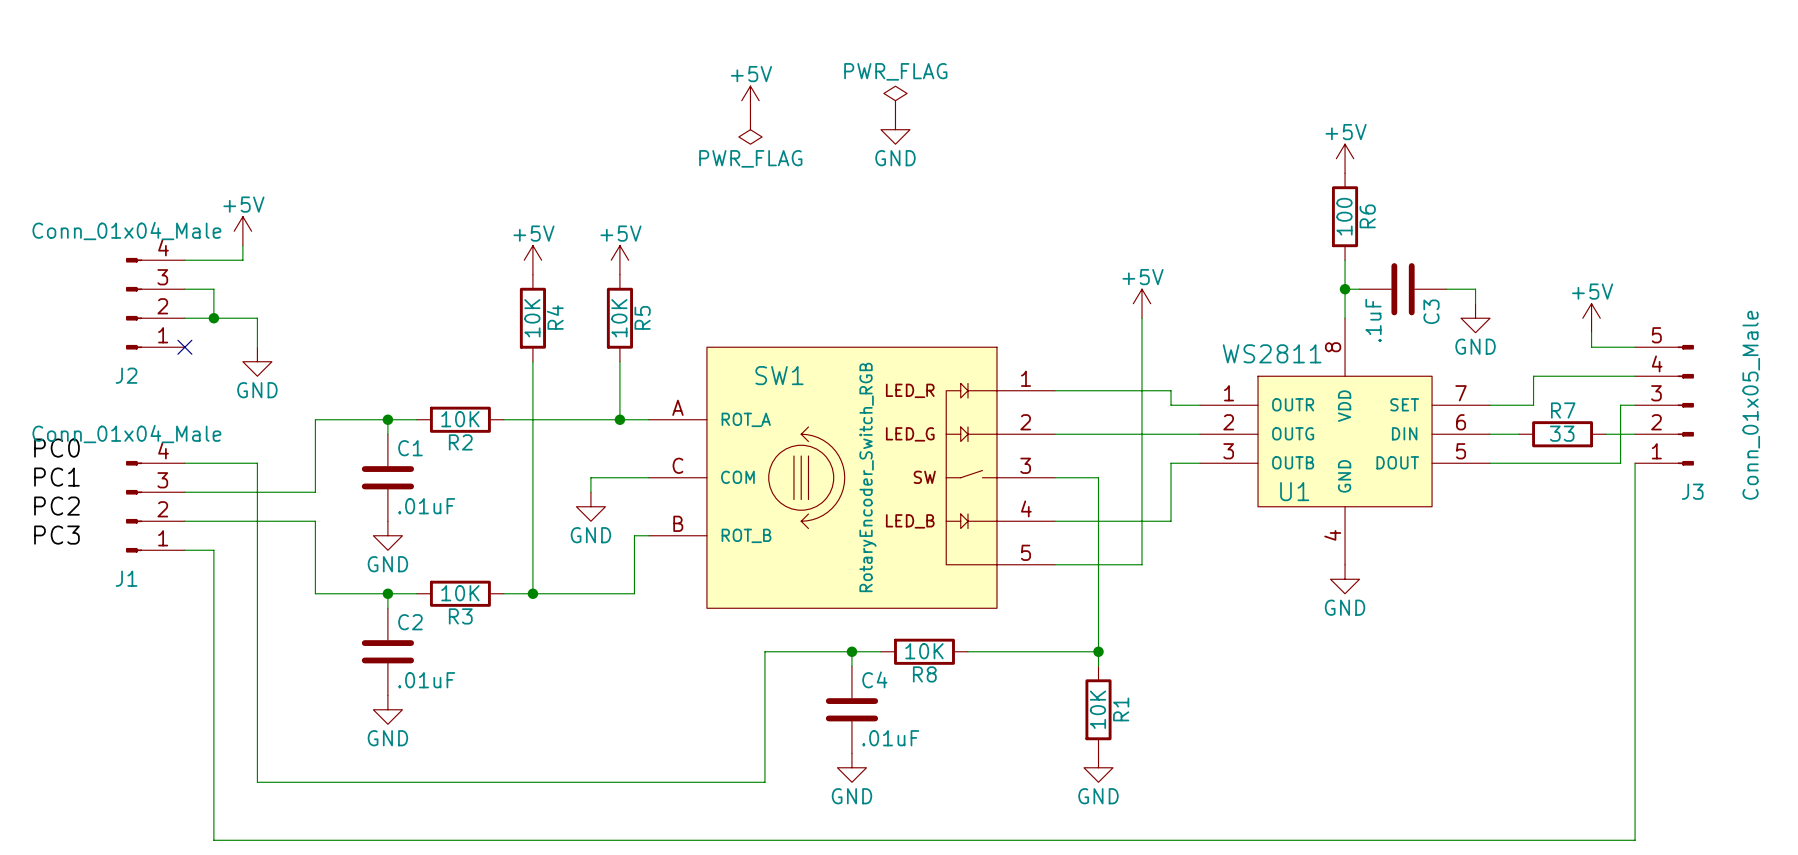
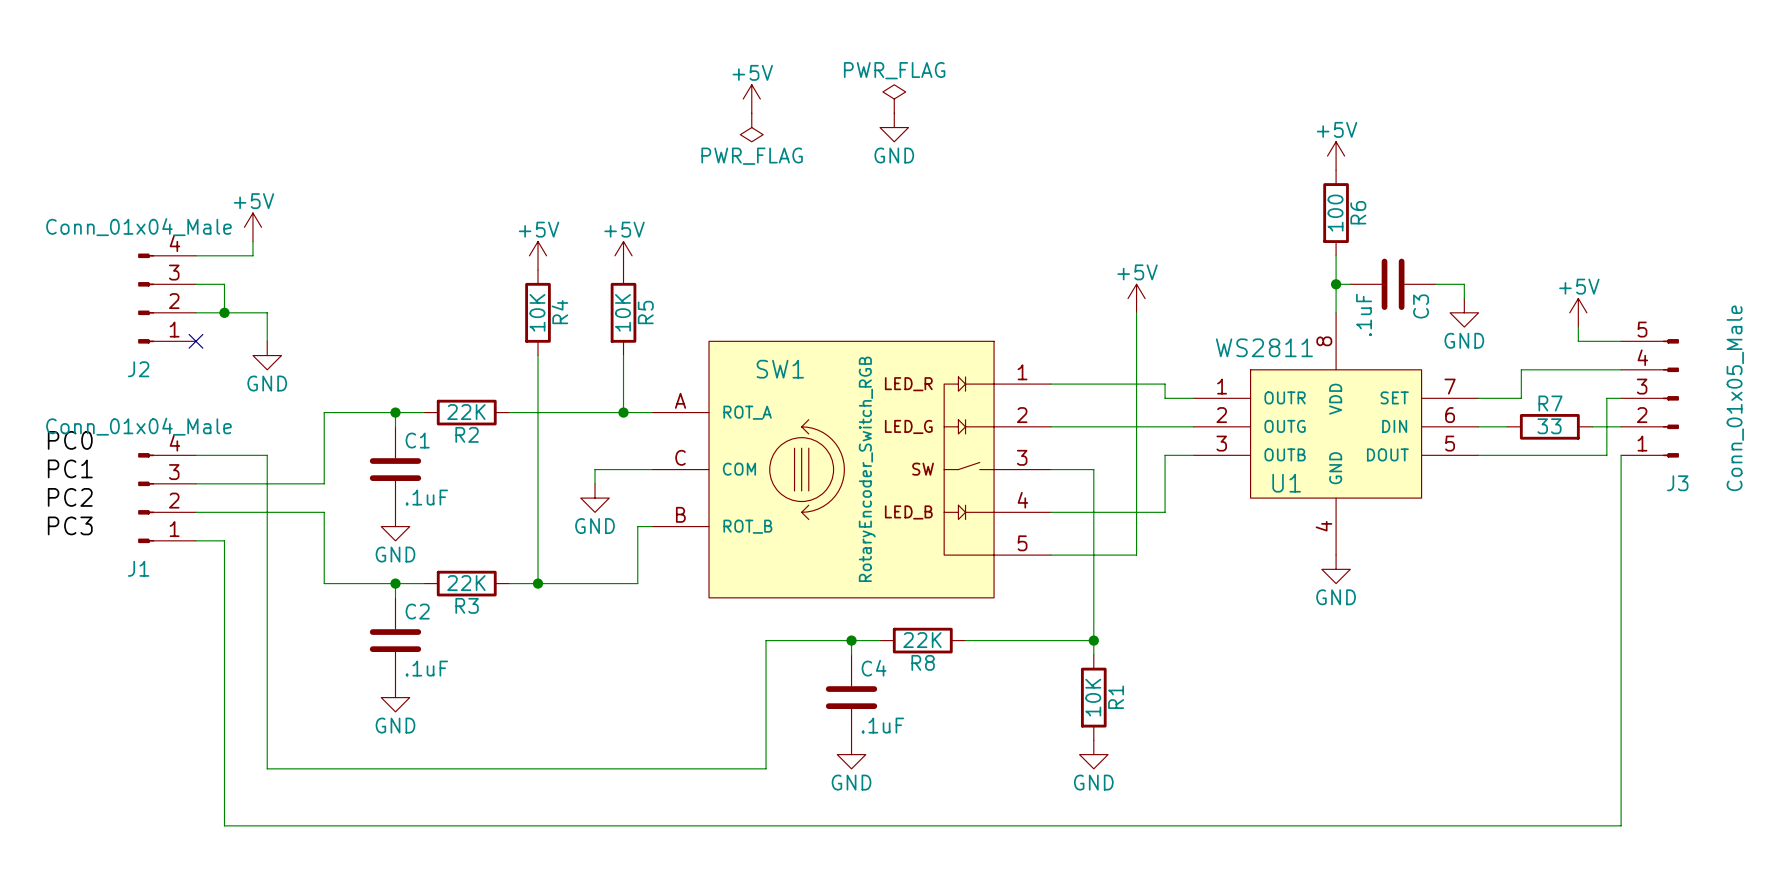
R2 value: 10K (460, 419) -> 22K (466, 412)
C1 value: .01uF (426, 506) -> .1uF (426, 497)
R3 value: 10K (460, 593) -> 22K (466, 583)
R8 value: 10K (924, 651) -> 22K (922, 640)
C2 value: .01uF (426, 680) -> .1uF (426, 668)
C4 value: .01uF (890, 738) -> .1uF (882, 725)

